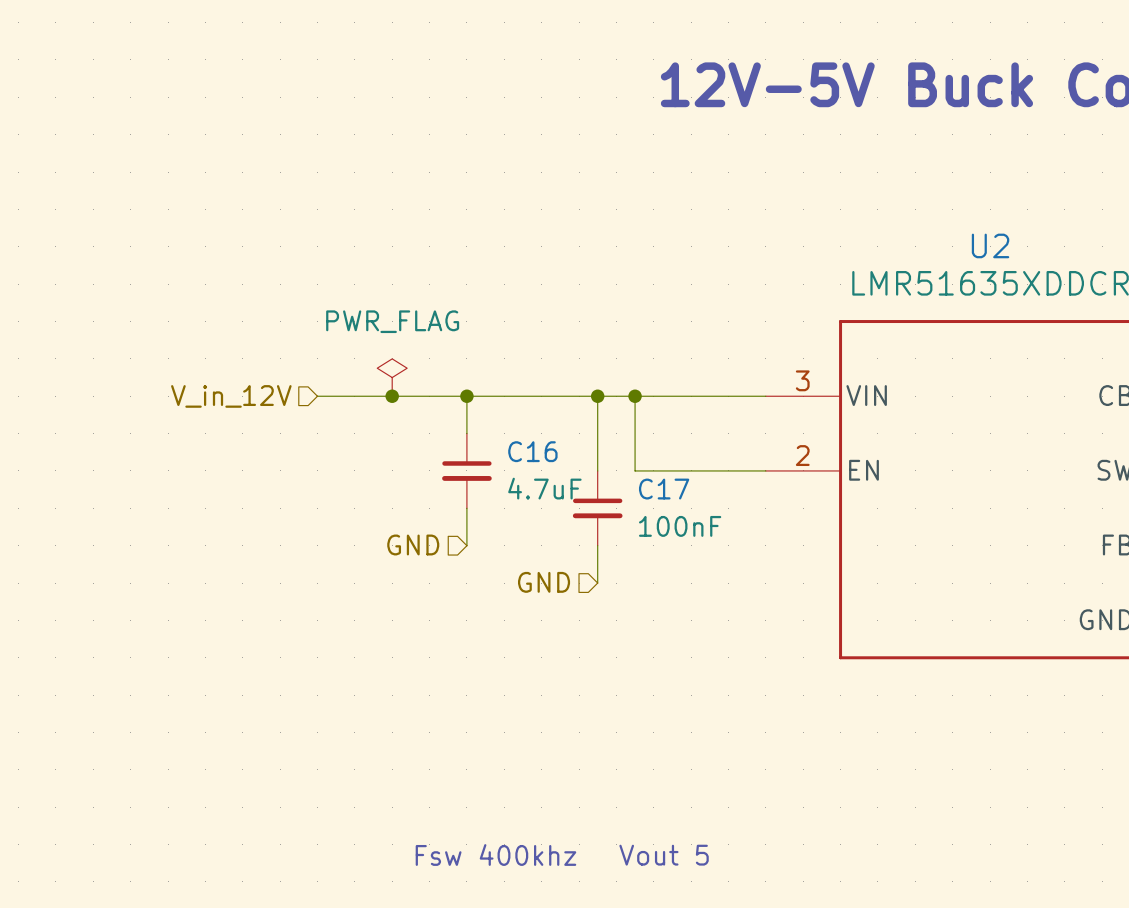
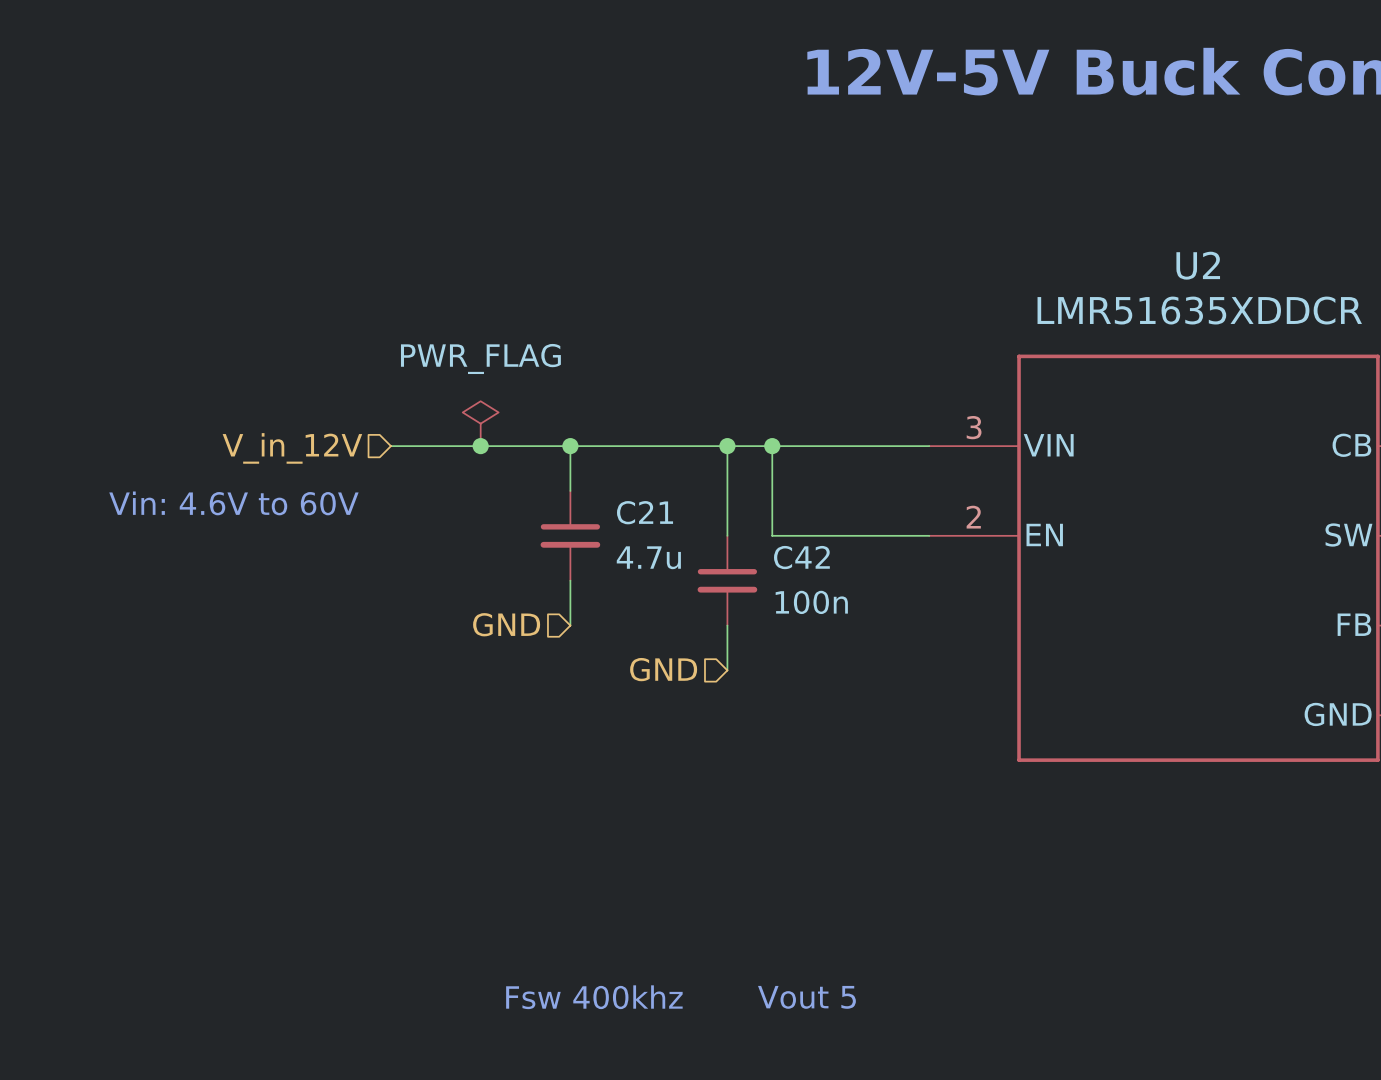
text: none -> Vin: 4.6V to 60V (233, 503)
C16 name: C16 (532, 451) -> C21 (645, 512)
C16 value: 4.7uF (544, 488) -> 4.7u (648, 557)
C17 name: C17 (664, 489) -> C42 (801, 557)
C17 value: 100nF (680, 526) -> 100n (811, 602)

